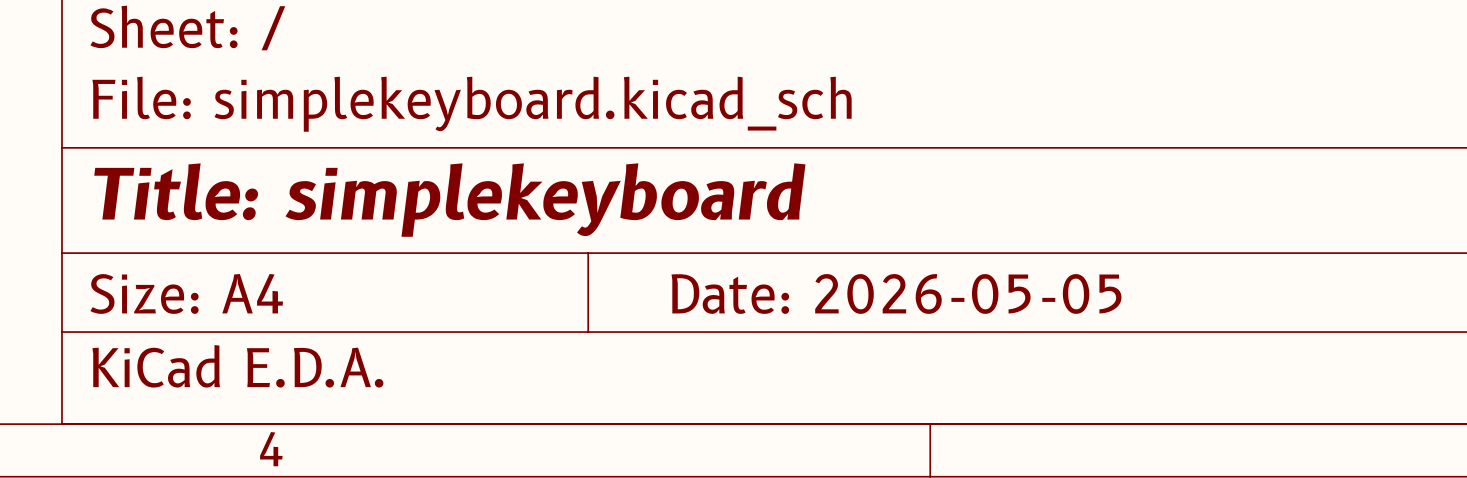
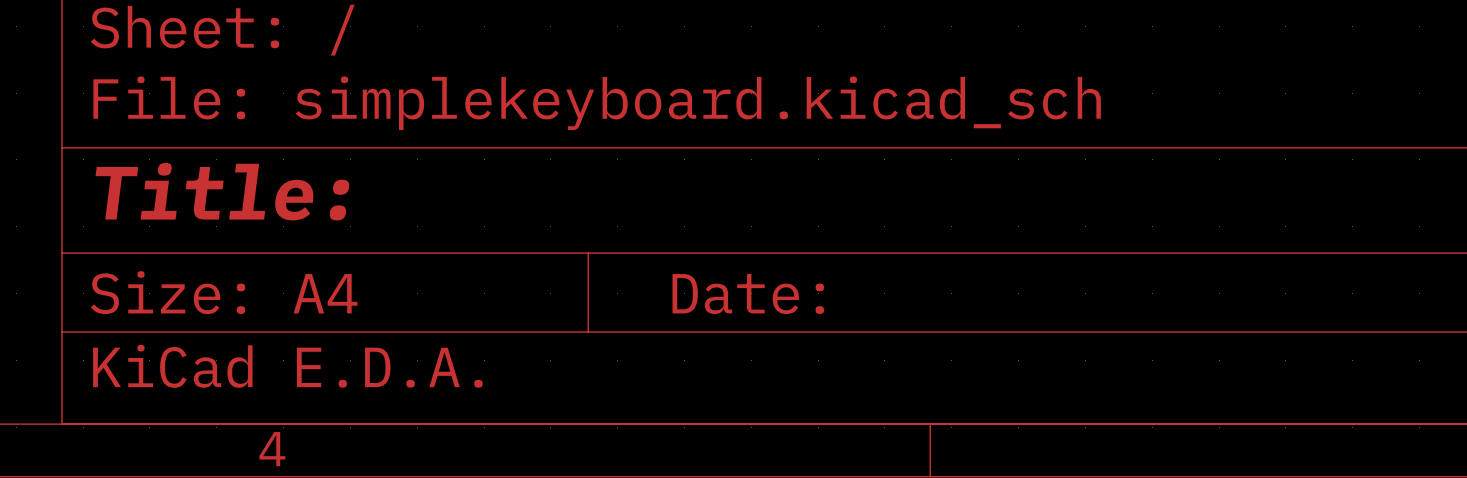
title block: Title: simplekeyboard (449, 200) -> Title: (222, 191)
title block: Date: 2026-05-05 (896, 293) -> Date: (748, 294)

